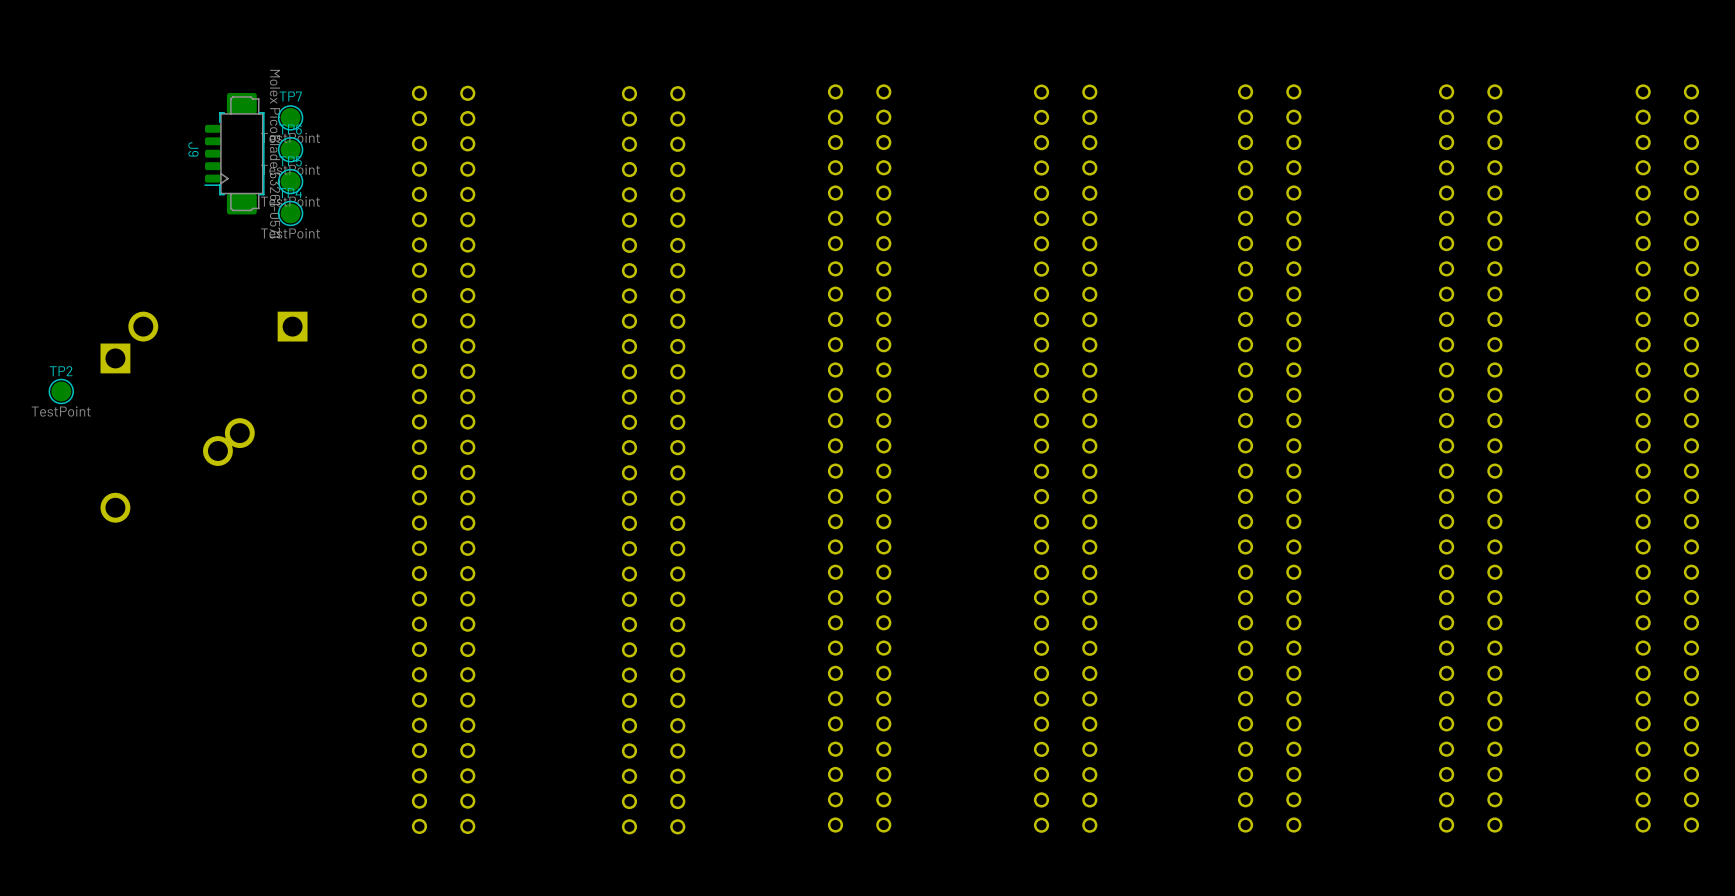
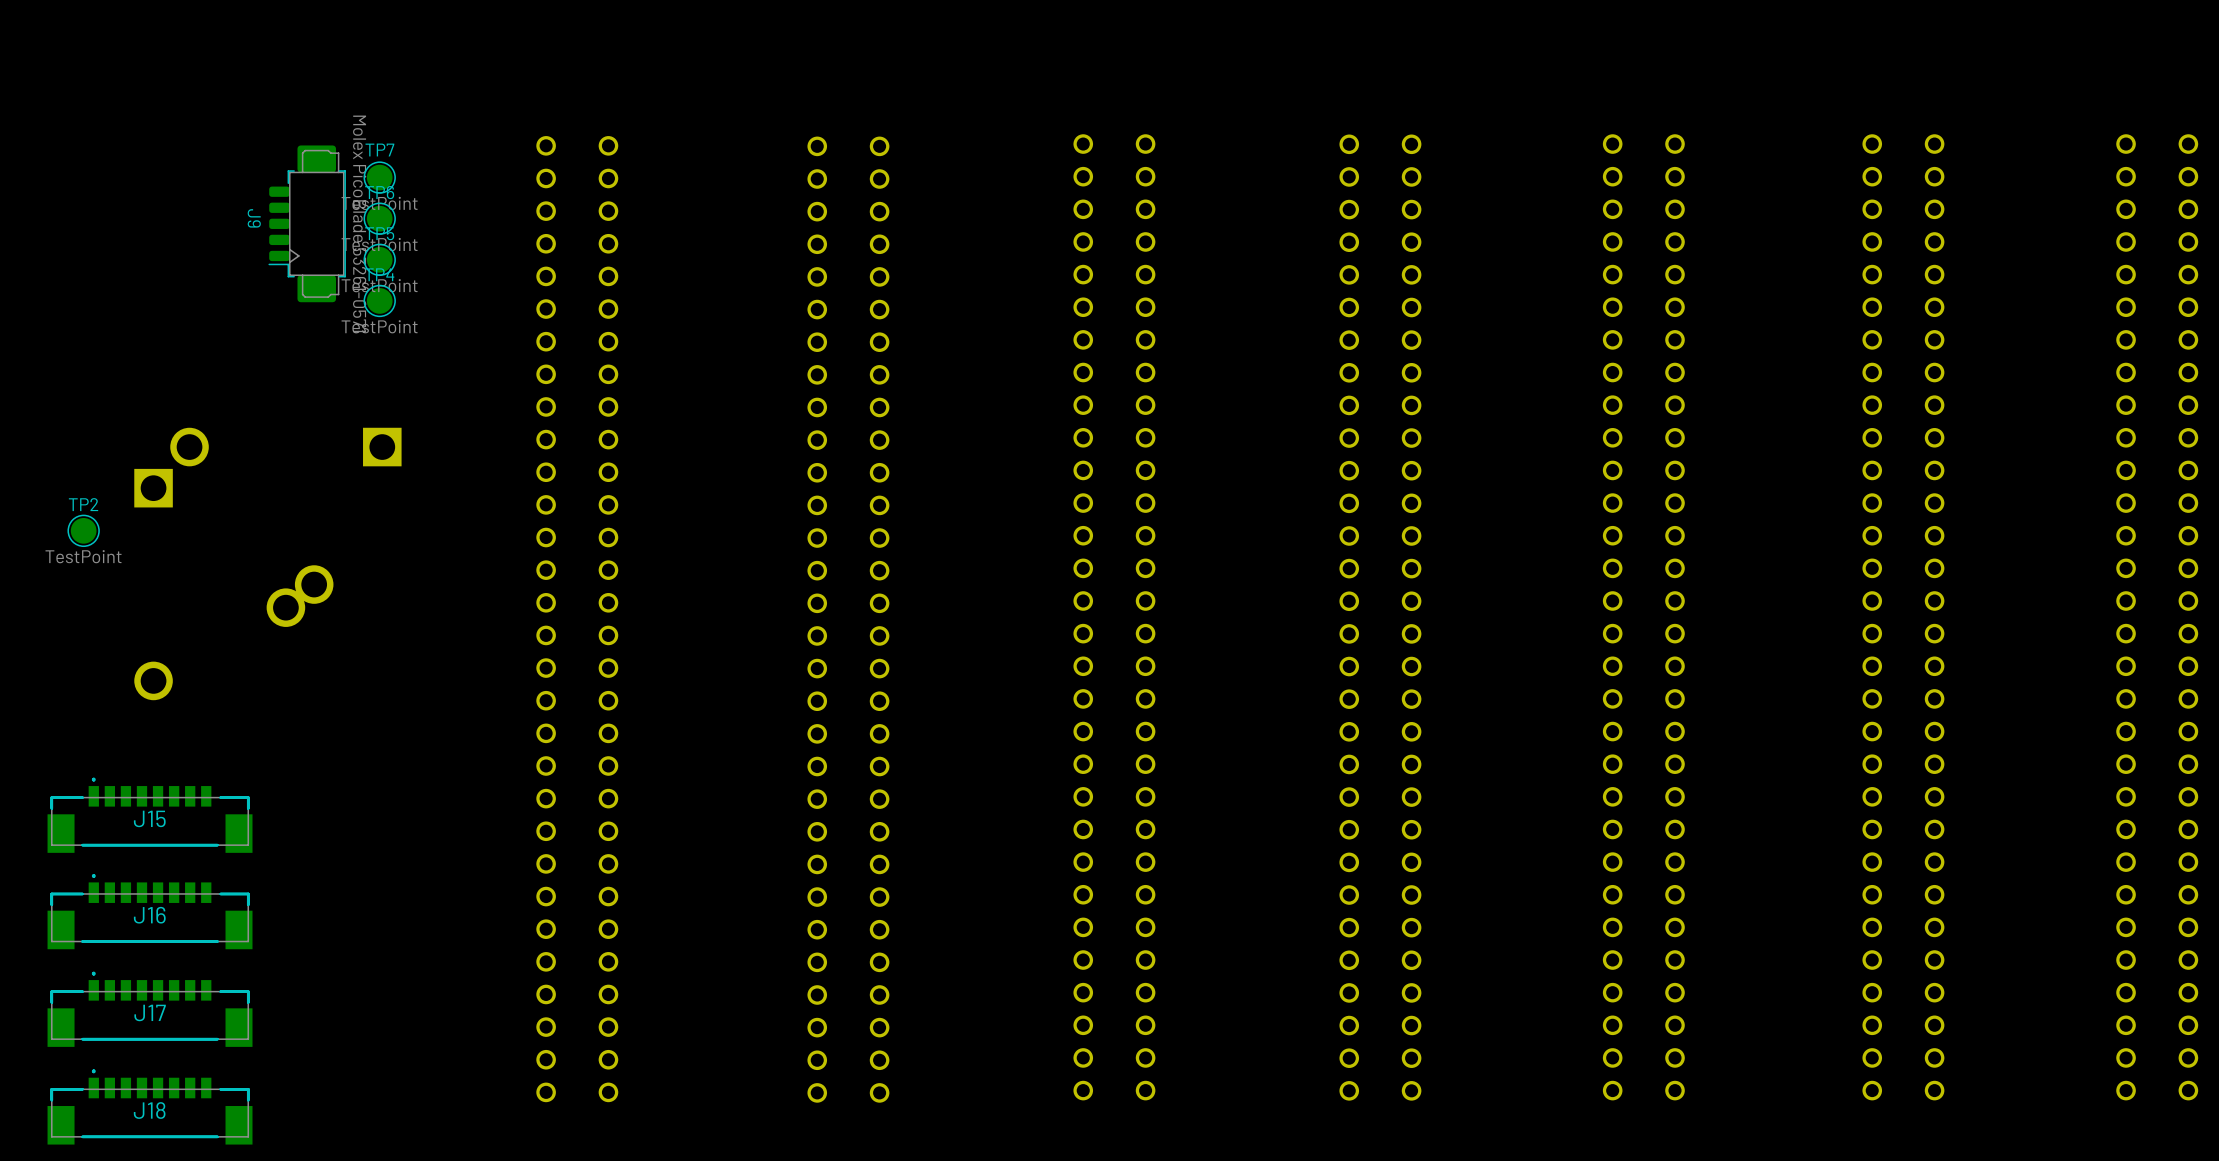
J15: none -> (150, 815)
J16: none -> (150, 911)
J17: none -> (150, 1009)
J18: none -> (150, 1106)

